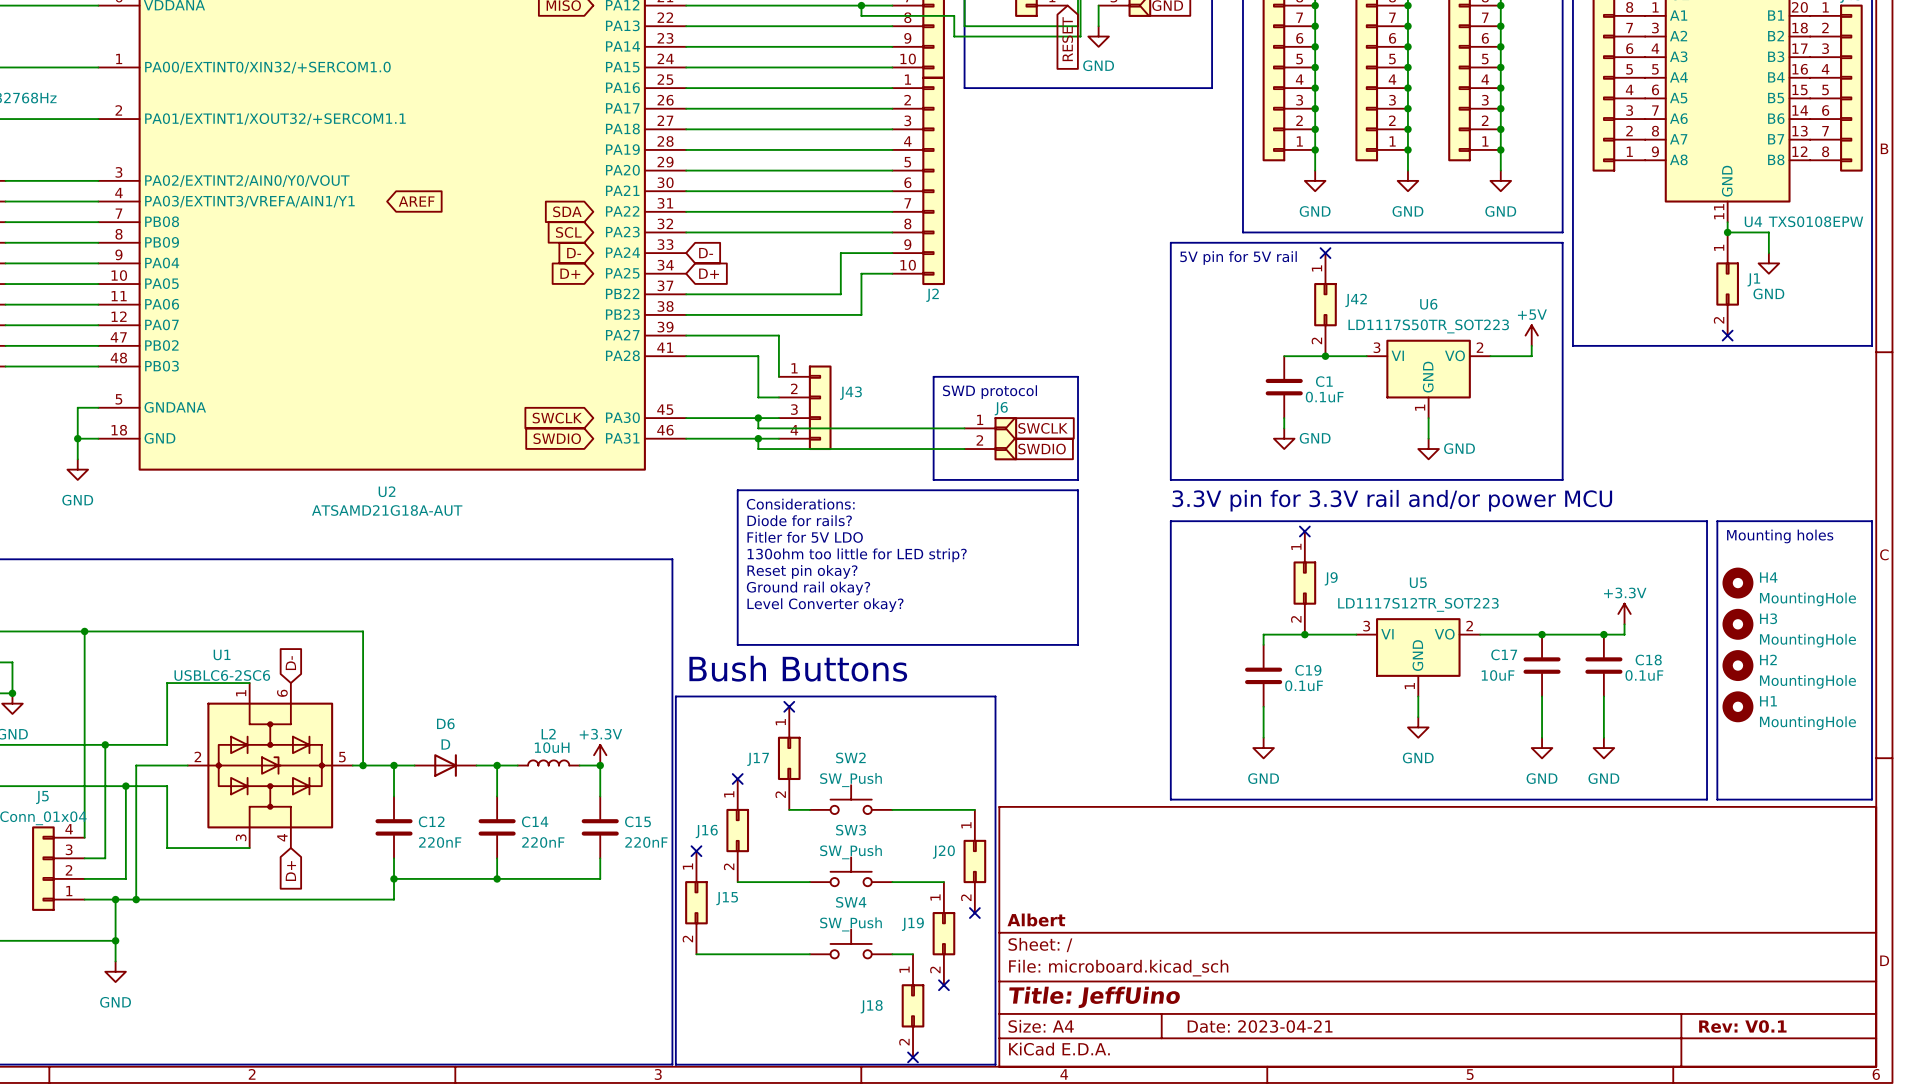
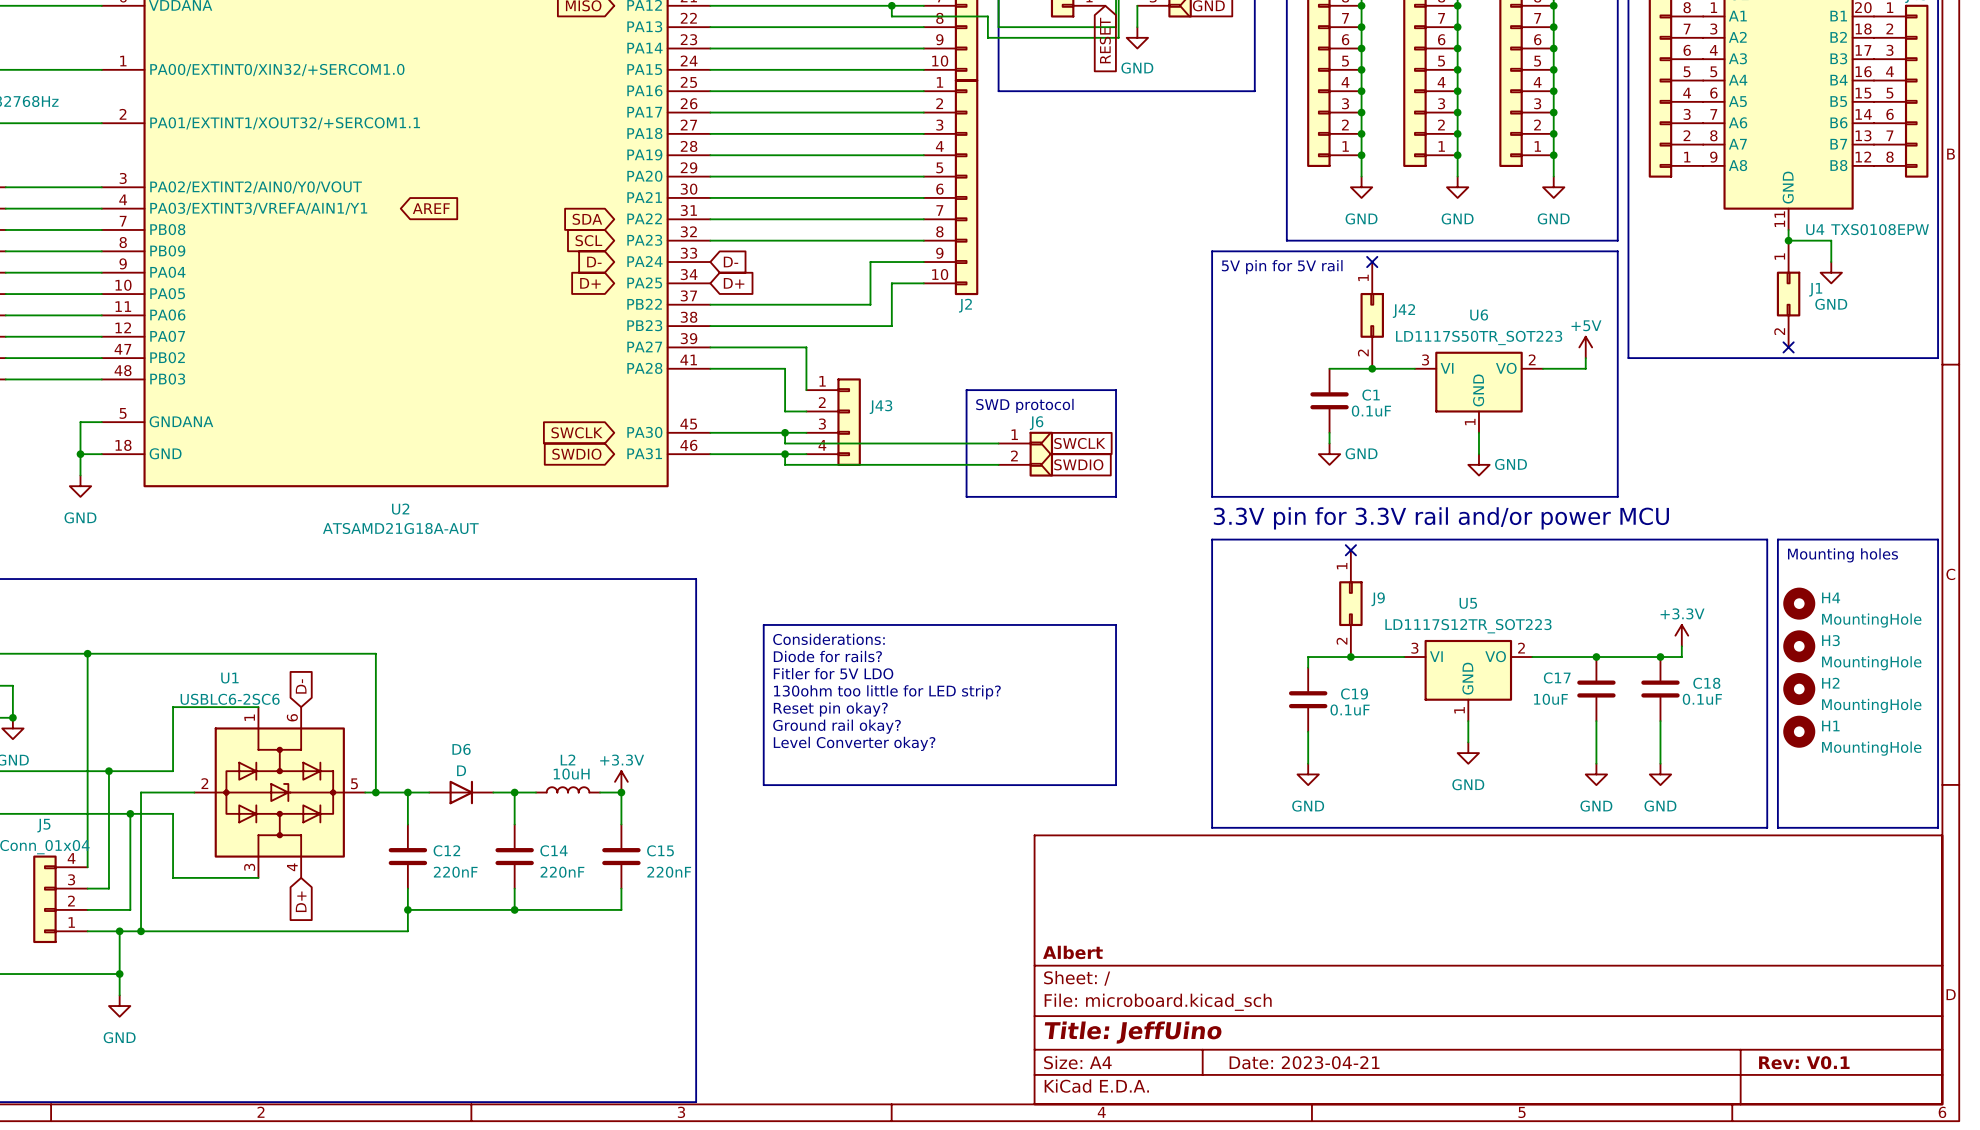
text position: Considerations: (800, 504) -> Considerations: (828, 639)
text position: Diode for rails? (799, 520) -> Diode for rails? (827, 656)
text position: Fitler for 5V LDO (805, 537) -> Fitler for 5V LDO (833, 673)
text position: 130ohm too little for LED strip? (857, 555) -> 130ohm too little for LED strip? (887, 692)
text position: Reset pin okay? (802, 571) -> Reset pin okay? (830, 709)
text position: Ground rail okay? (808, 588) -> Ground rail okay? (837, 726)
line: (737, 603) (737, 490) (1078, 490) (1078, 603) -> (763, 624) (1116, 624)
text position: Level Converter okay? (825, 605) -> Level Converter okay? (854, 743)
line: (737, 644) (1078, 644) -> (763, 667) (763, 785) (1116, 785) (1116, 667)
text: Bush Buttons (798, 668) -> none
line: (675, 696) (995, 696) (995, 1064) (675, 1064) (675, 696) -> none
no-connect mark: (789, 706) -> none
J17: (789, 758) -> none
no-connect mark: (737, 778) -> none
SW2: SW_Push (851, 799) -> none
wire: (789, 809) (809, 809) -> none
wire: (892, 809) (974, 809) -> none
J16: (737, 830) -> none
no-connect mark: (696, 851) -> none
J20: (974, 861) -> none
SW3: SW_Push (851, 871) -> none
wire: (737, 882) (809, 882) -> none
wire: (892, 882) (943, 882) -> none
J15: (696, 902) -> none
no-connect mark: (974, 913) -> none
J19: (943, 933) -> none
SW4: SW_Push (851, 943) -> none
wire: (696, 954) (809, 954) -> none
wire: (892, 954) (913, 954) -> none
no-connect mark: (943, 985) -> none
J18: (913, 1005) -> none
no-connect mark: (913, 1057) -> none

